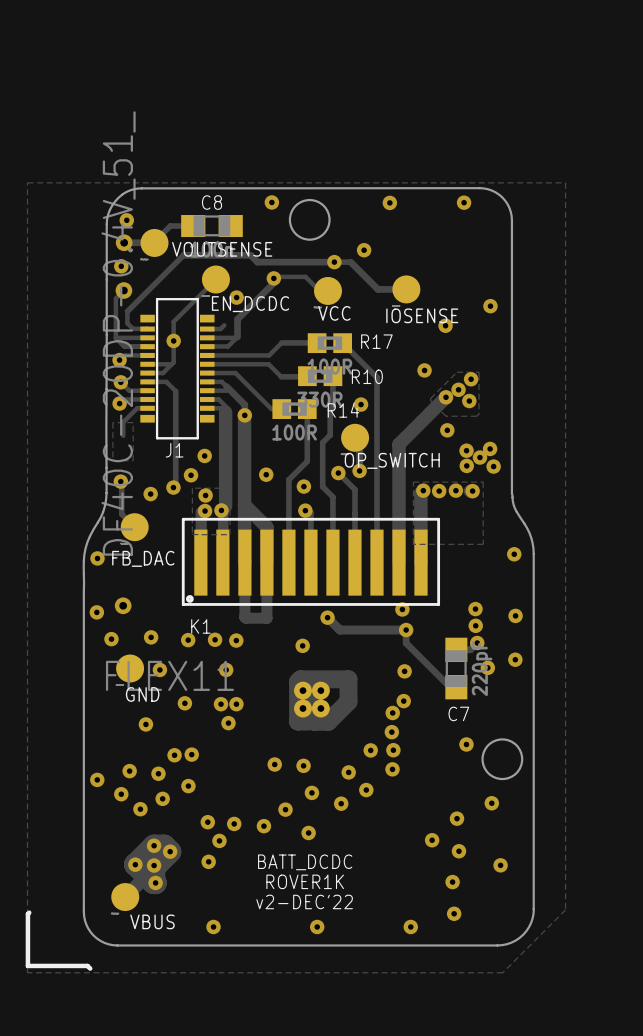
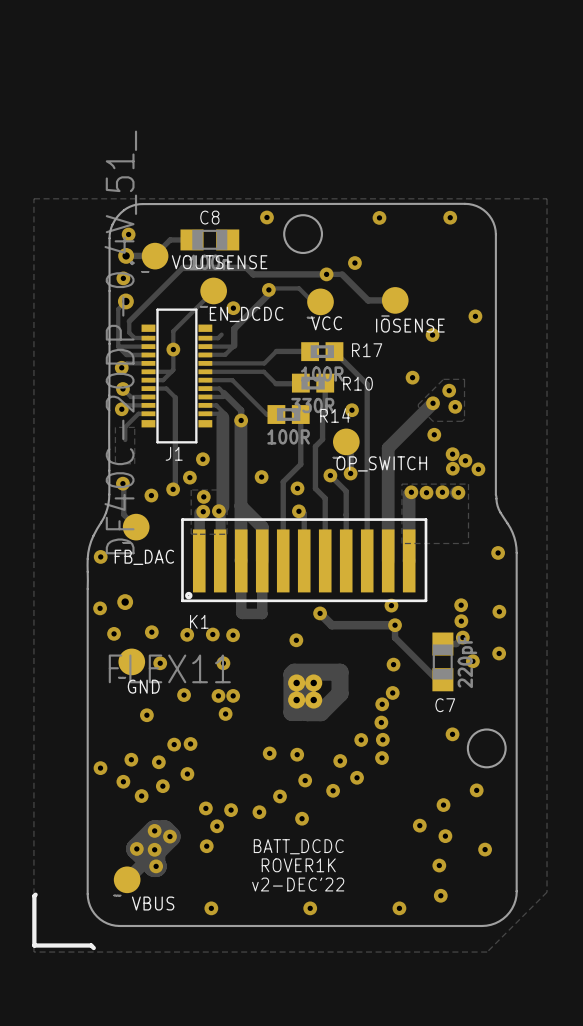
via: (471, 379) -> none
via: none -> (449, 390)
via: (458, 389) -> none
via: (490, 448) -> none

